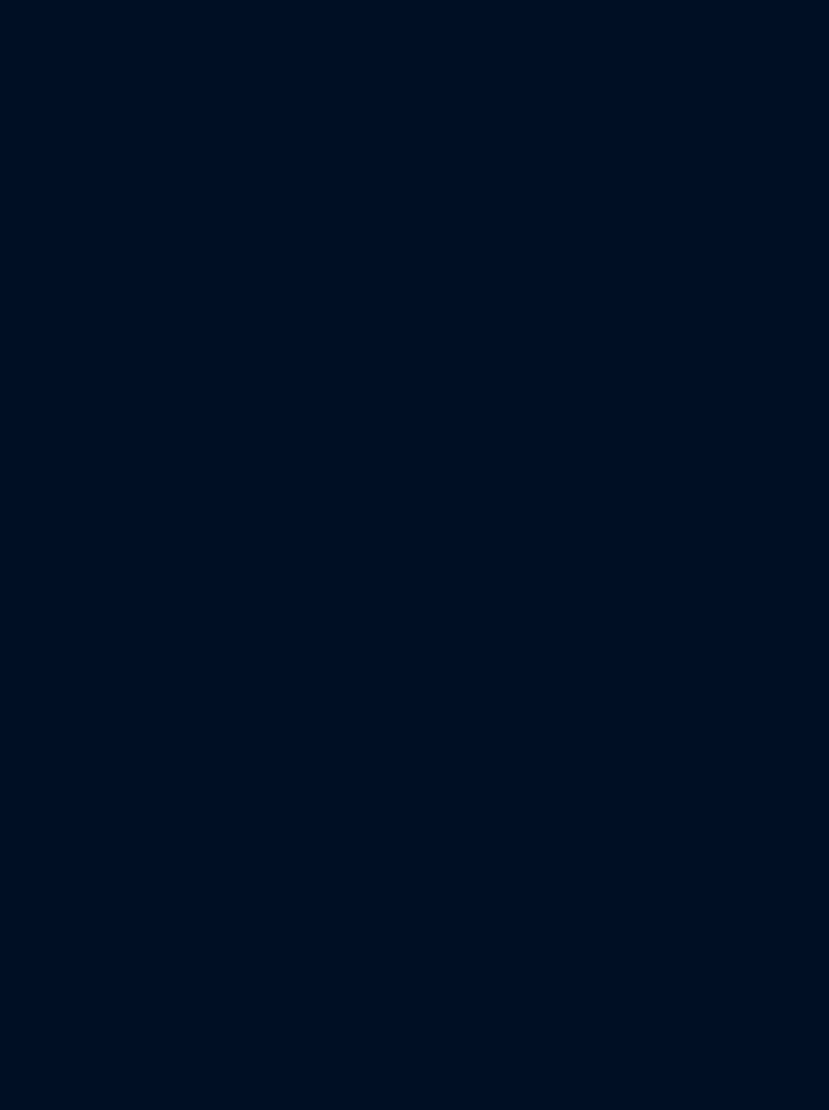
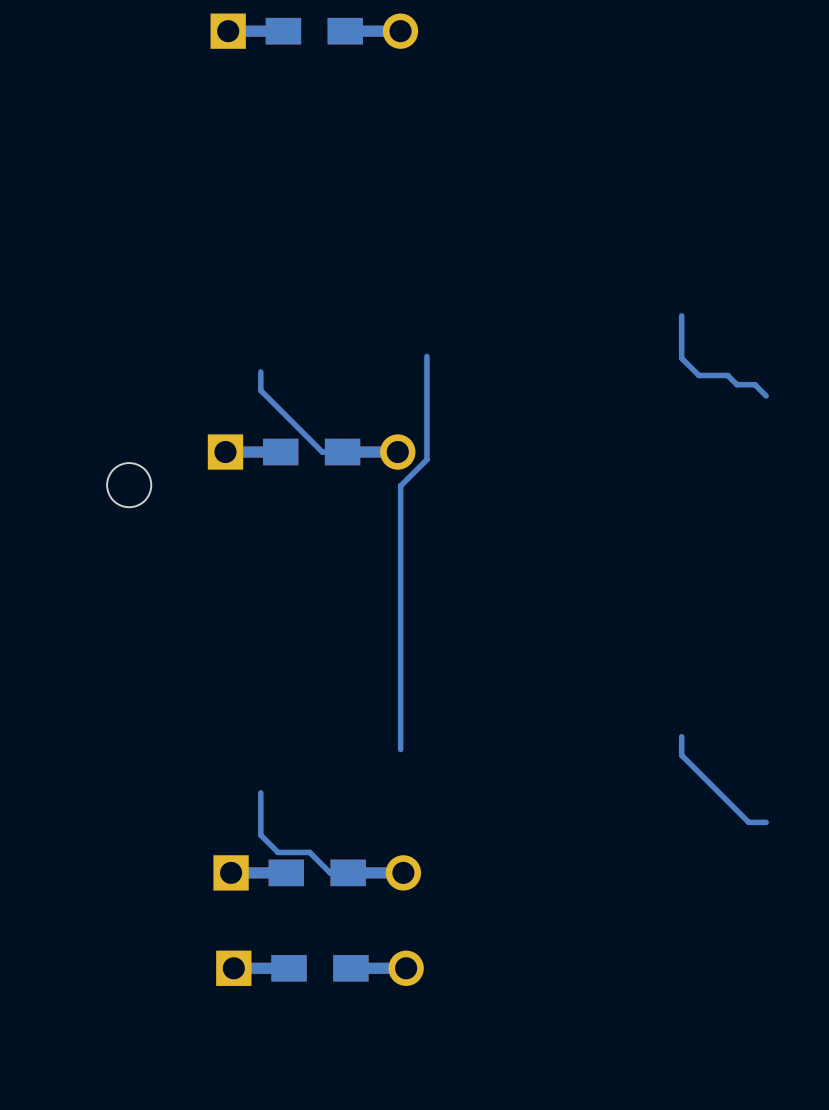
part: none -> (314, 31)
bottom track: none -> (681, 315) (681, 358) (698, 375) (727, 375) (736, 384) (754, 384) (766, 395)
bottom track: none -> (426, 356) (426, 459) (400, 485) (400, 749)
bottom track: none -> (260, 371) (260, 390) (322, 452) (342, 452)
part: none -> (311, 452)
round board edge: none -> [106, 462, 152, 508]
bottom track: none -> (681, 736) (681, 755) (748, 822) (766, 822)
bottom track: none -> (260, 792) (260, 835) (278, 852) (309, 852) (330, 872) (348, 872)
part: none -> (317, 872)
part: none -> (319, 968)

